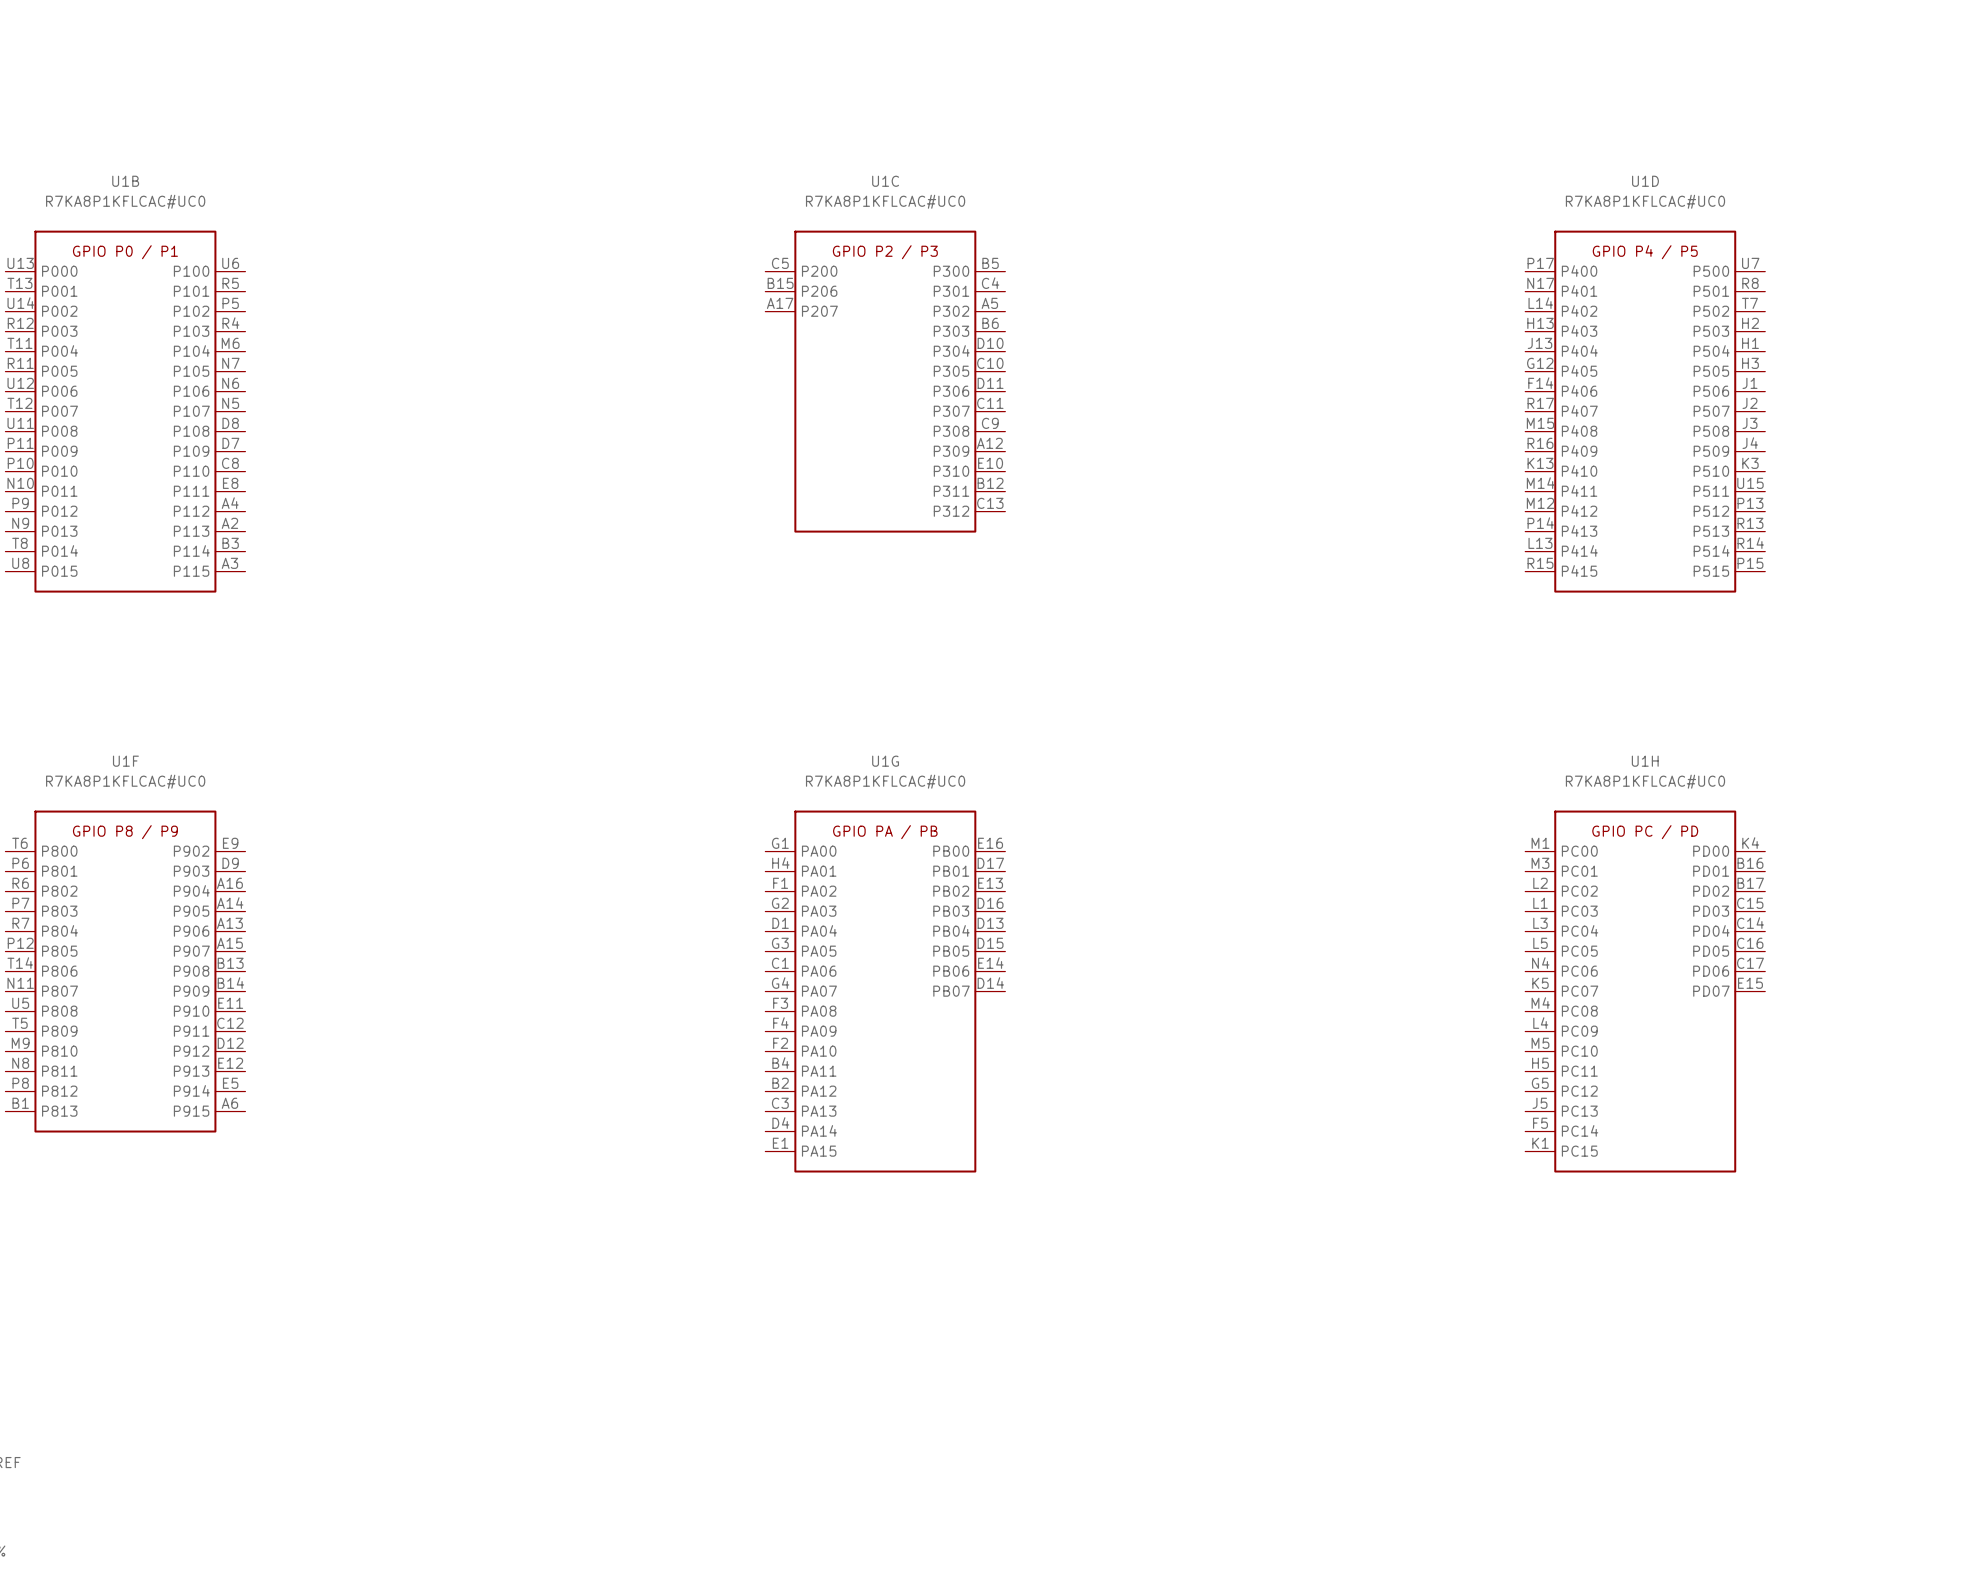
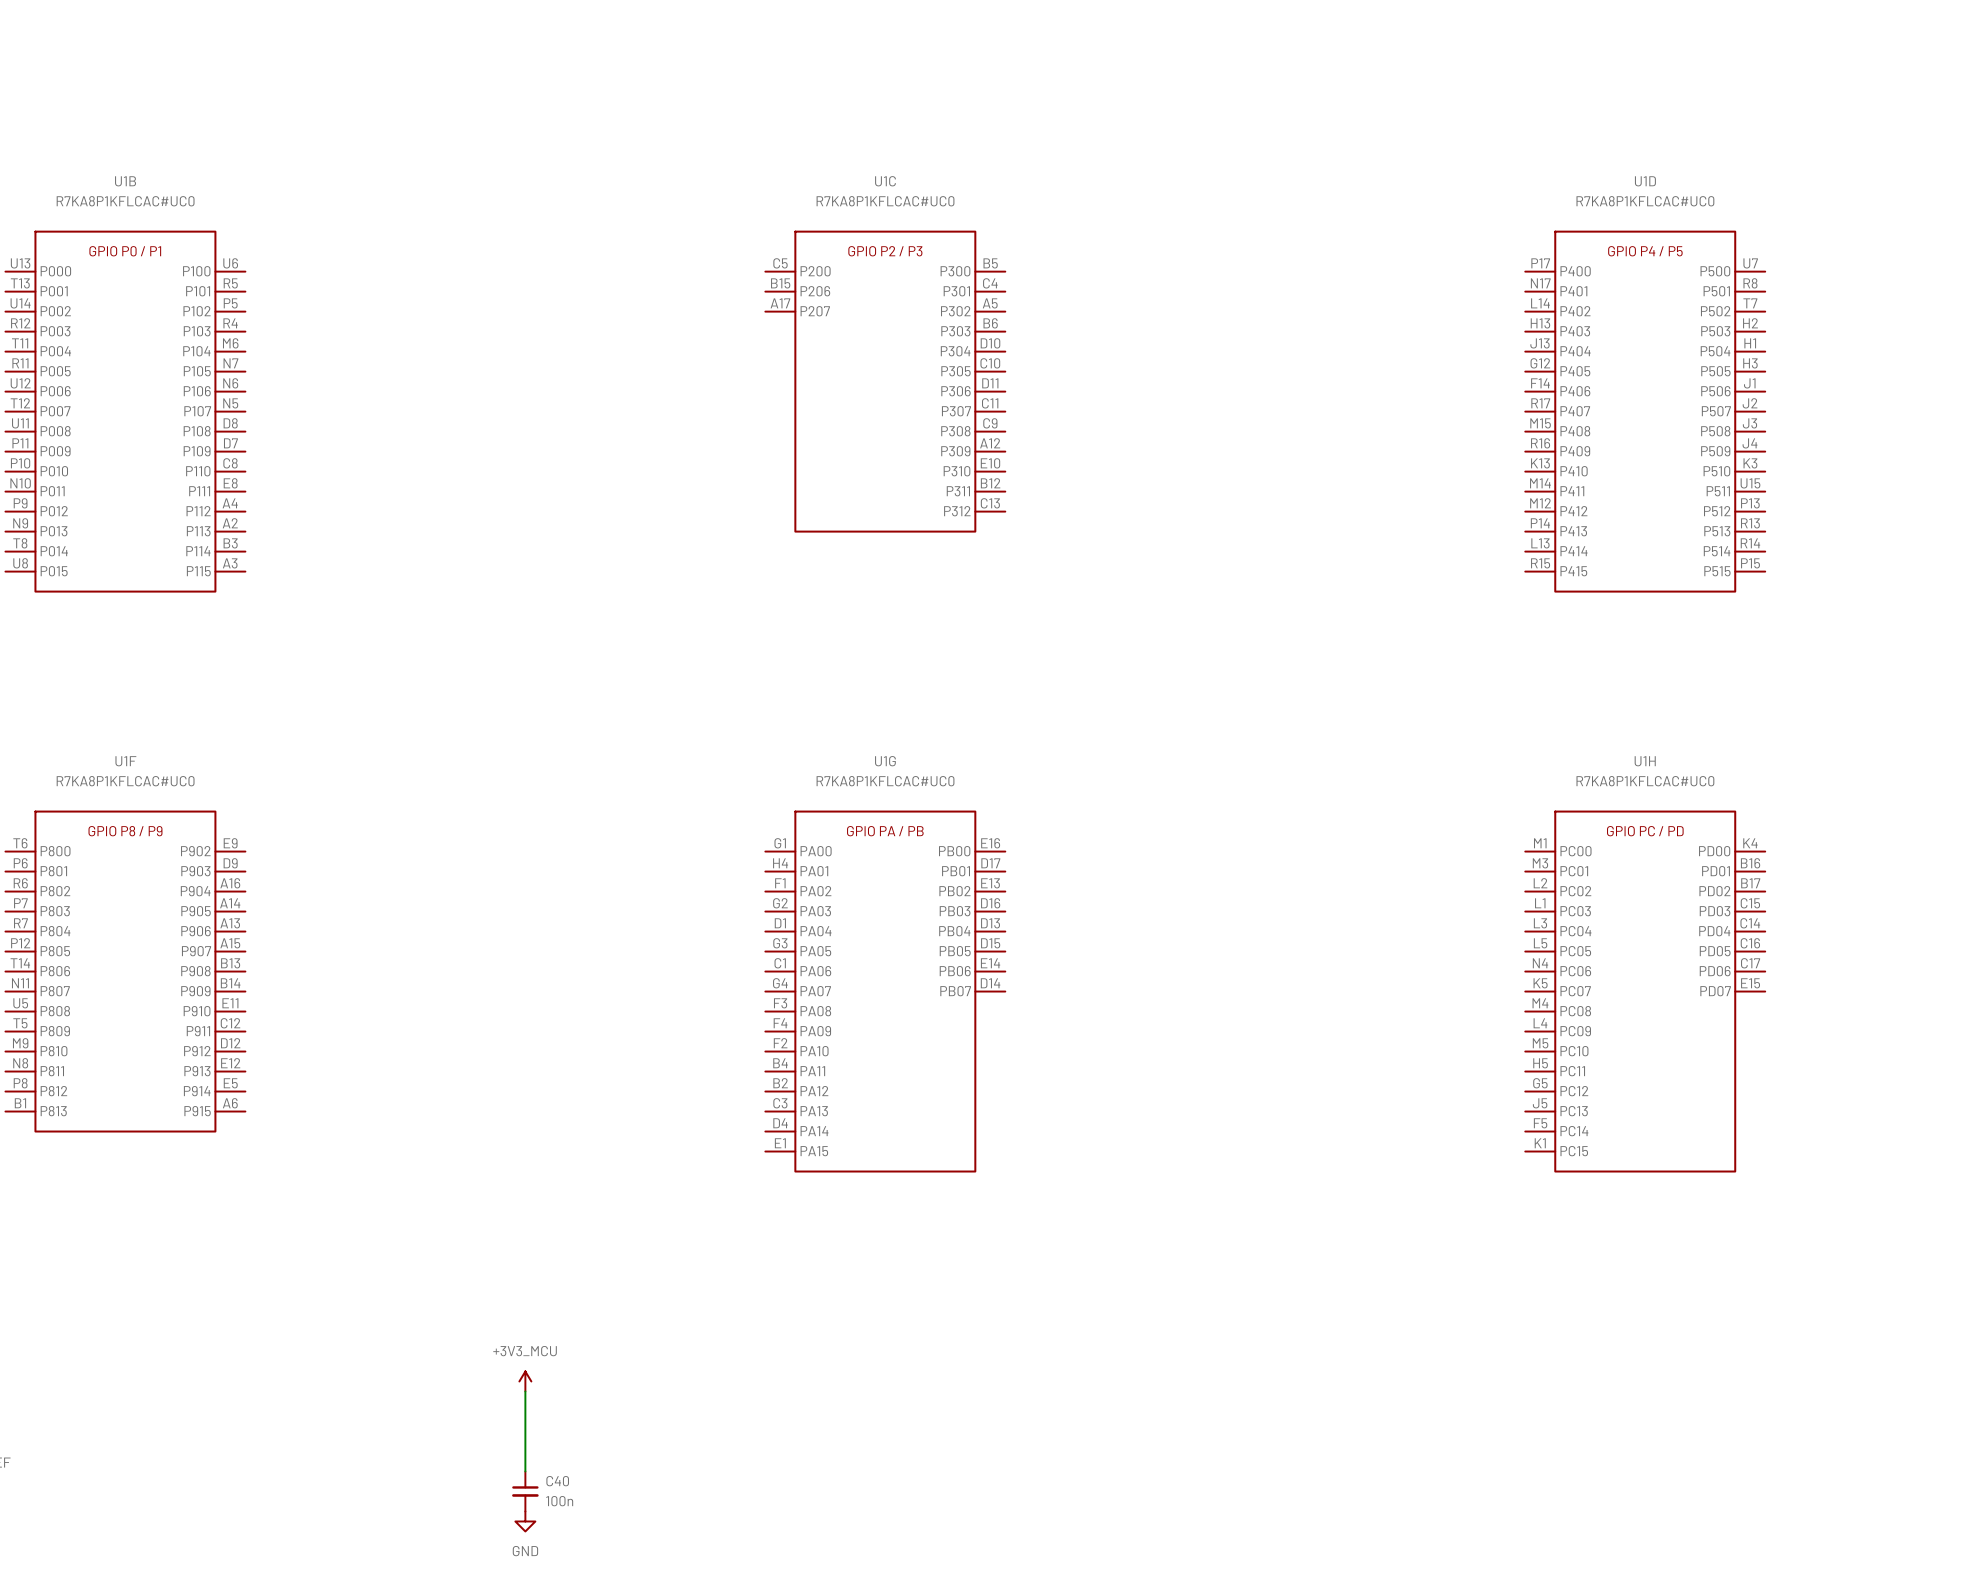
power symbol: none -> +3V3_MCU (525, 1381)
wire: none -> (525, 1391) (525, 1471)
C40: none -> 100n (525, 1491)
power symbol: none -> GND (525, 1521)

